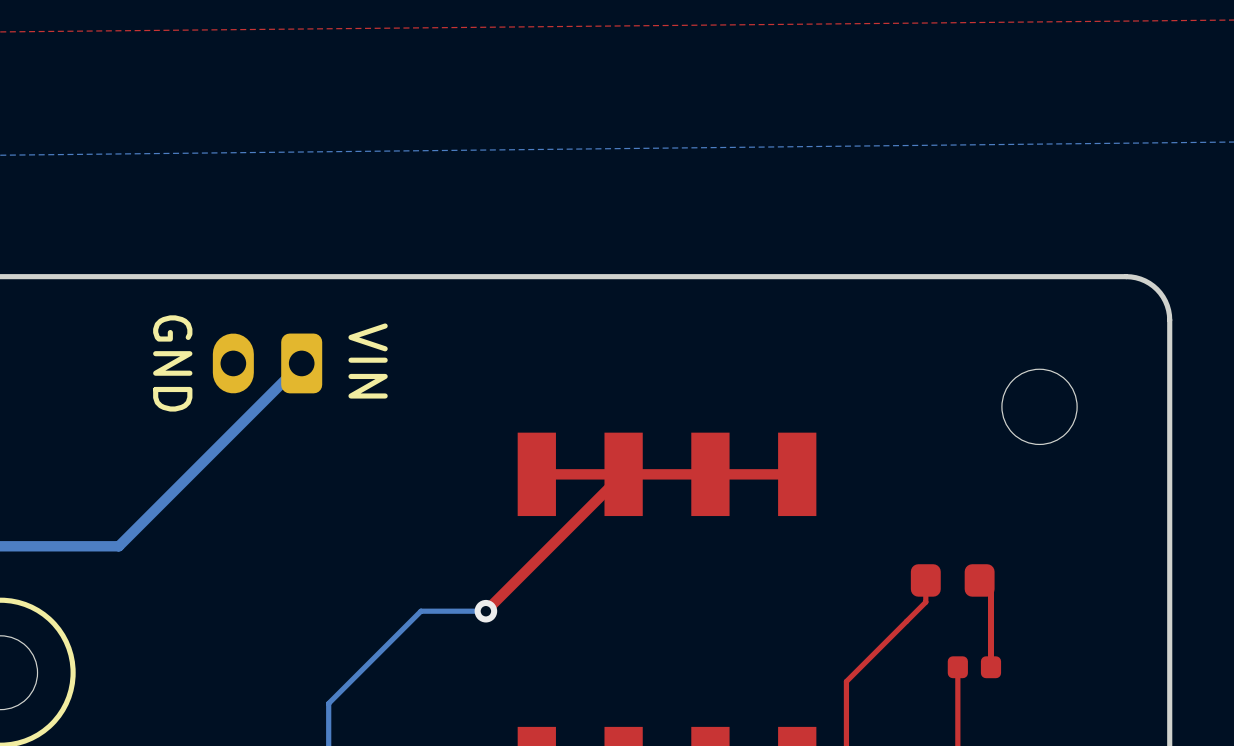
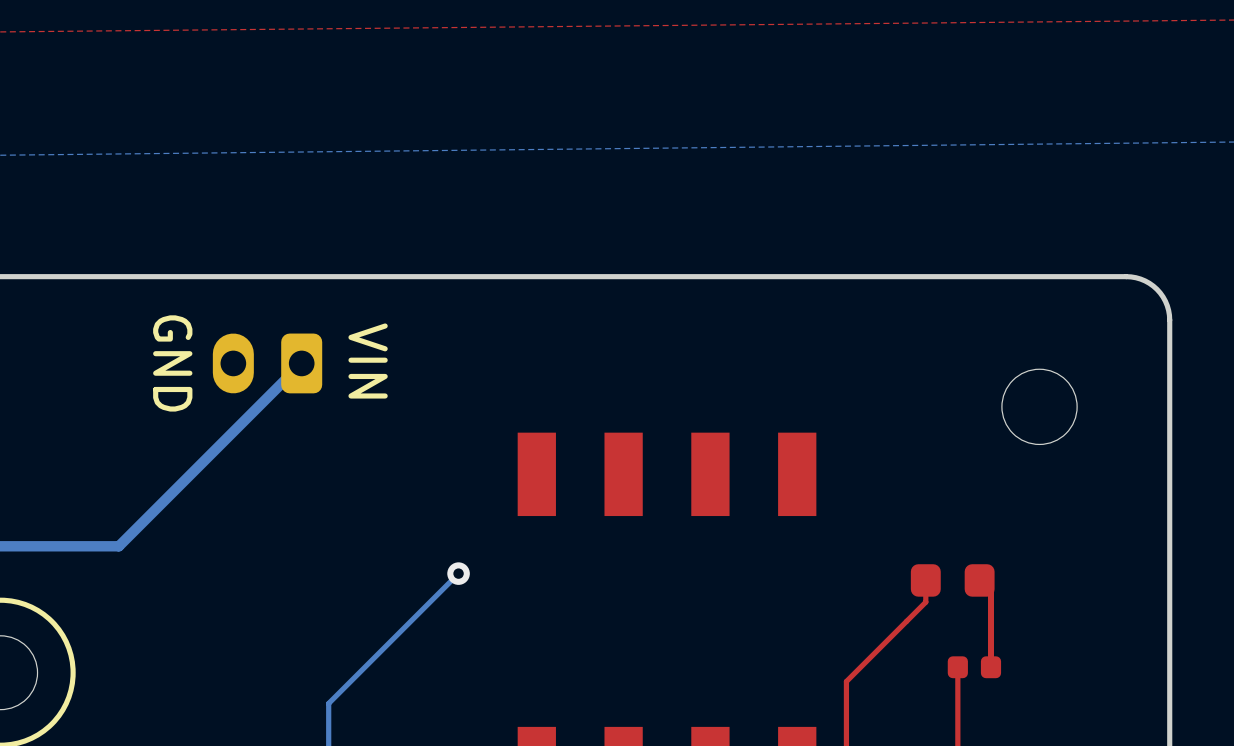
top track: (622, 474) (485, 611) (611, 485) (623, 485) -> none
top track: (797, 474) (536, 474) -> none
bottom track: (485, 611) (420, 611) -> (458, 573) (420, 611)
via position: (485, 611) -> (458, 573)

